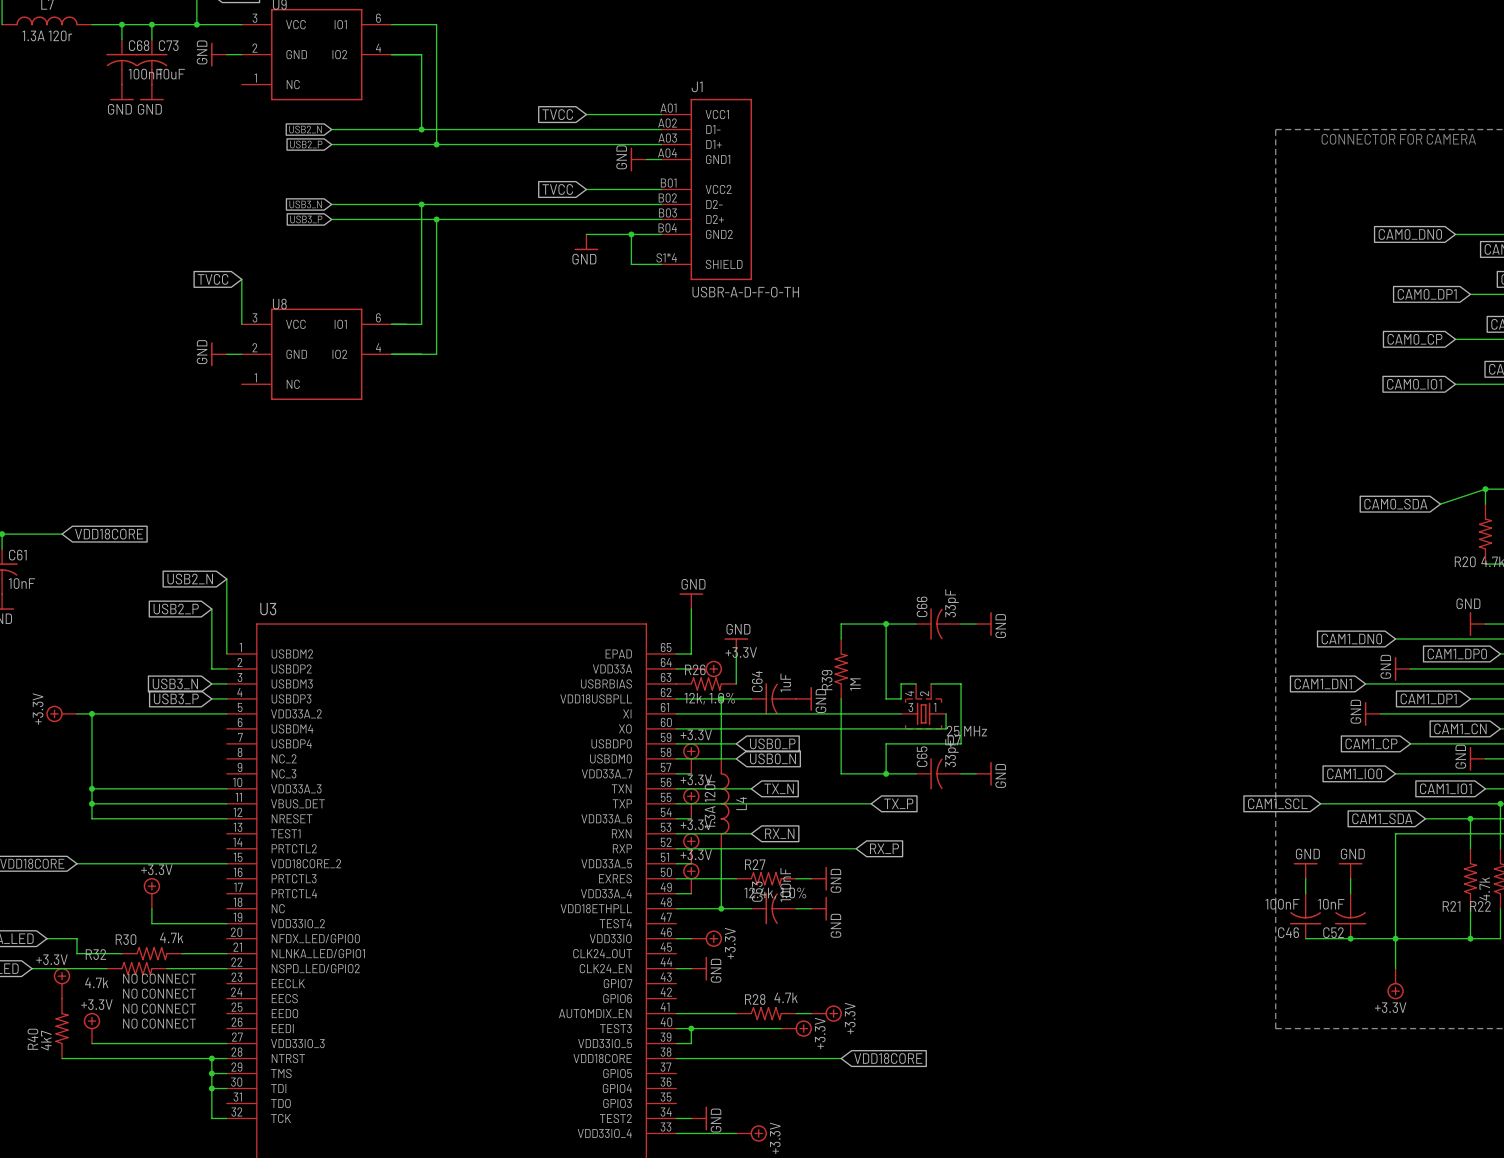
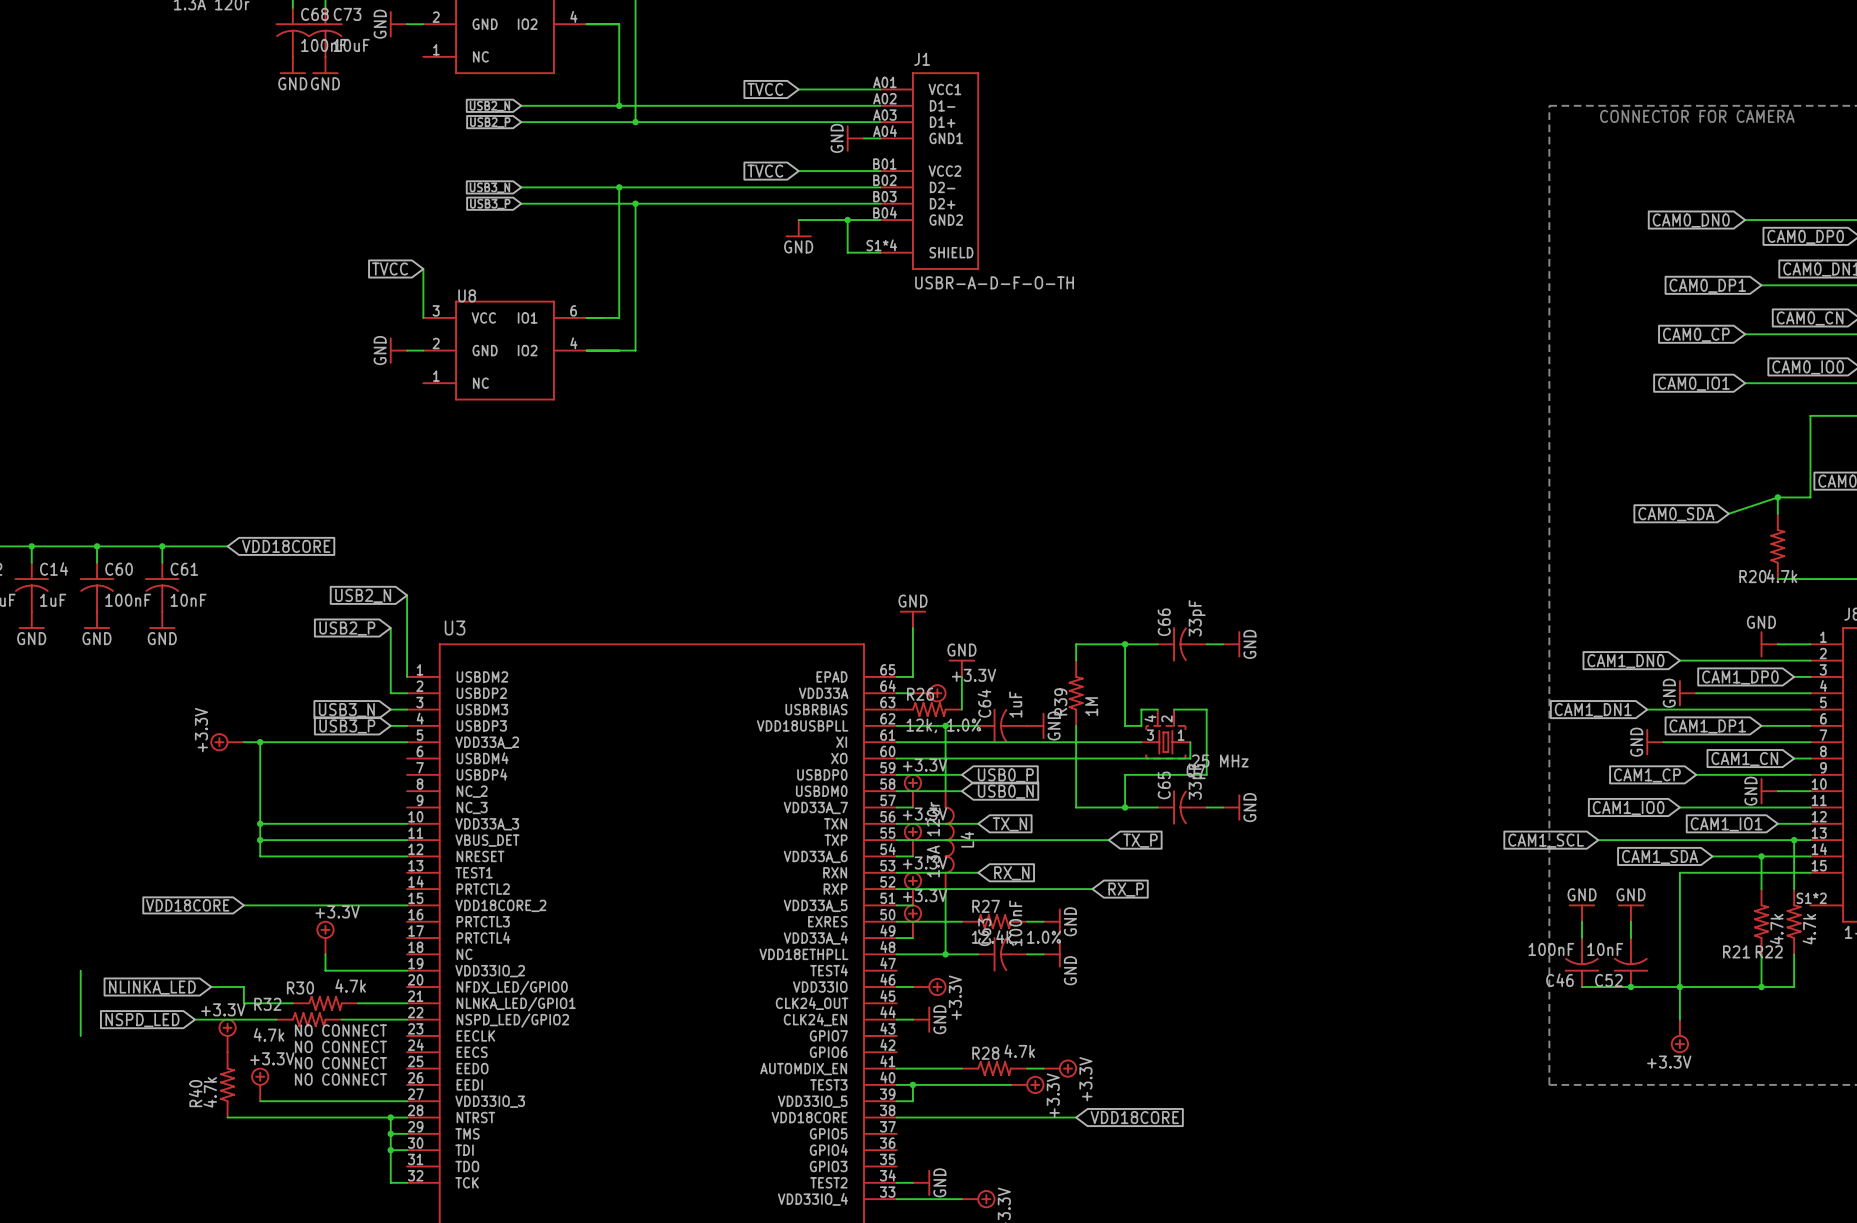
R40 value: 4k7 (46, 1040) -> 4.7k (210, 1092)

